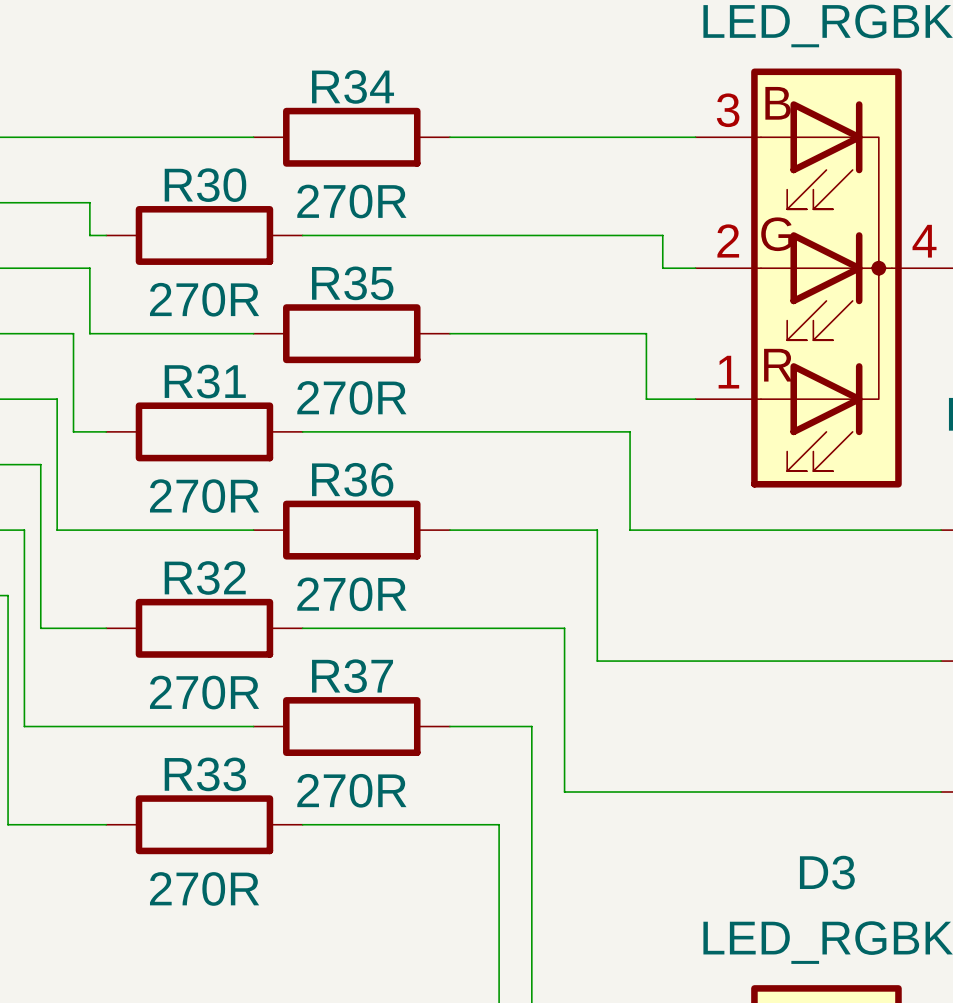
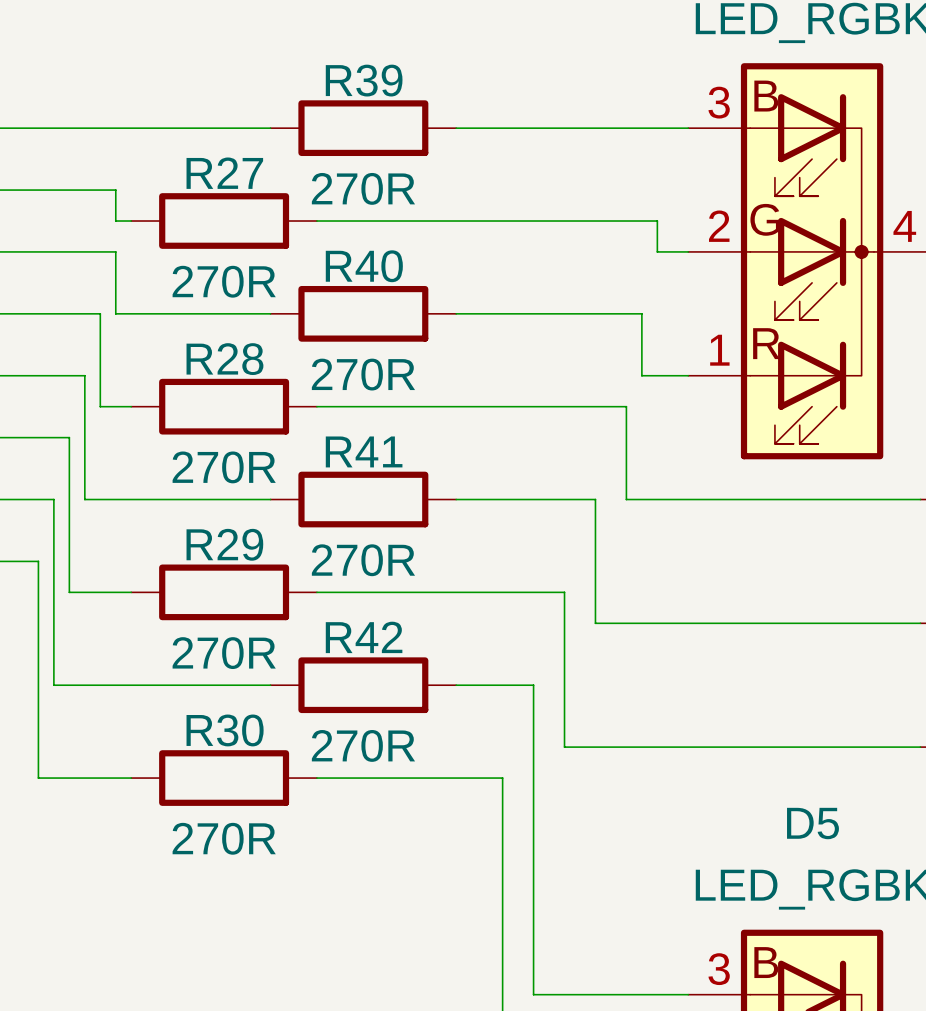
R34 name: R34 (353, 86) -> R39 (364, 80)
R30 name: R30 (205, 185) -> R27 (224, 173)
R35 name: R35 (352, 283) -> R40 (364, 266)
R31 name: R31 (205, 381) -> R28 (224, 359)
R36 name: R36 (352, 479) -> R41 (364, 451)
R32 name: R32 (205, 577) -> R29 (224, 544)
R37 name: R37 (352, 676) -> R42 (364, 637)
R33 name: R33 (205, 774) -> R30 (225, 730)
D3 name: D3 (827, 872) -> D5 (812, 823)

